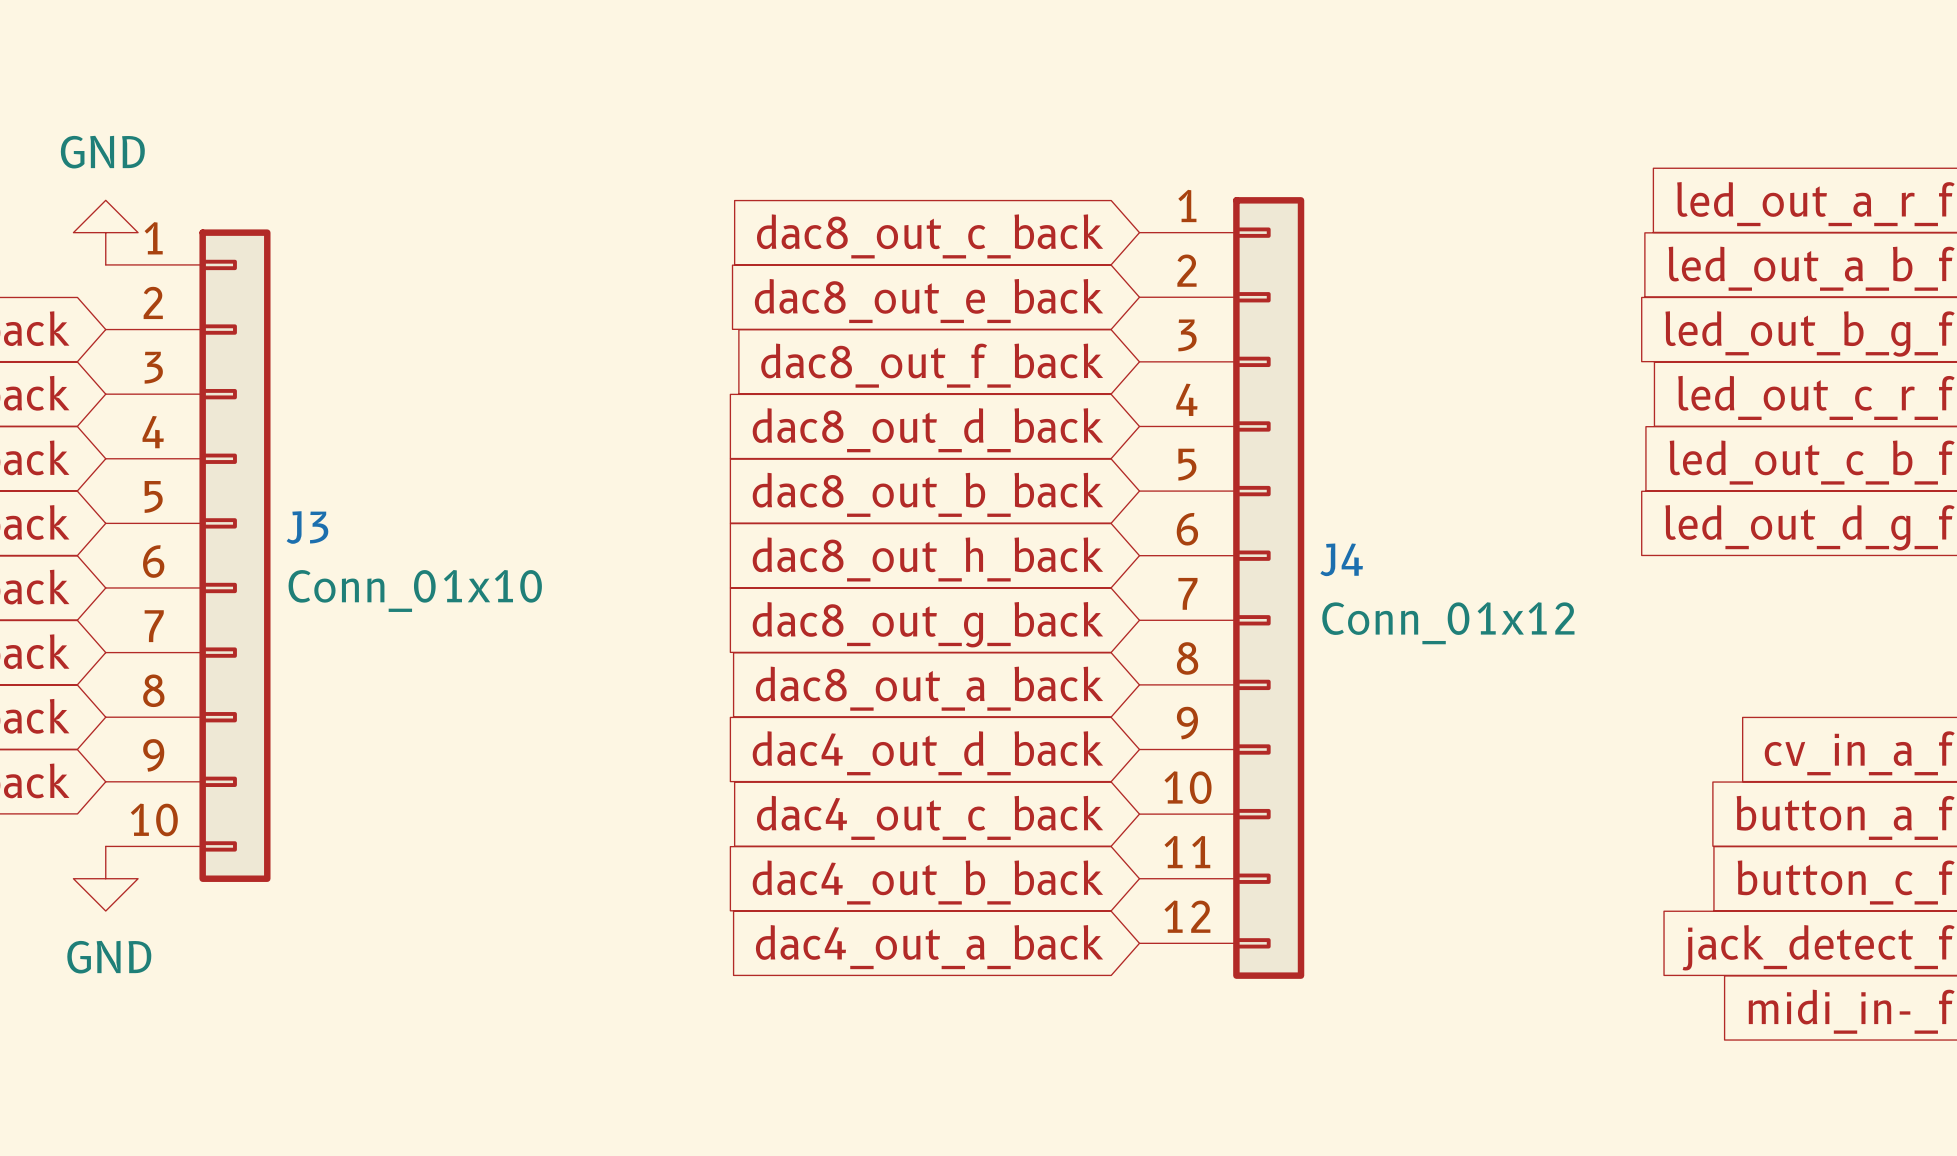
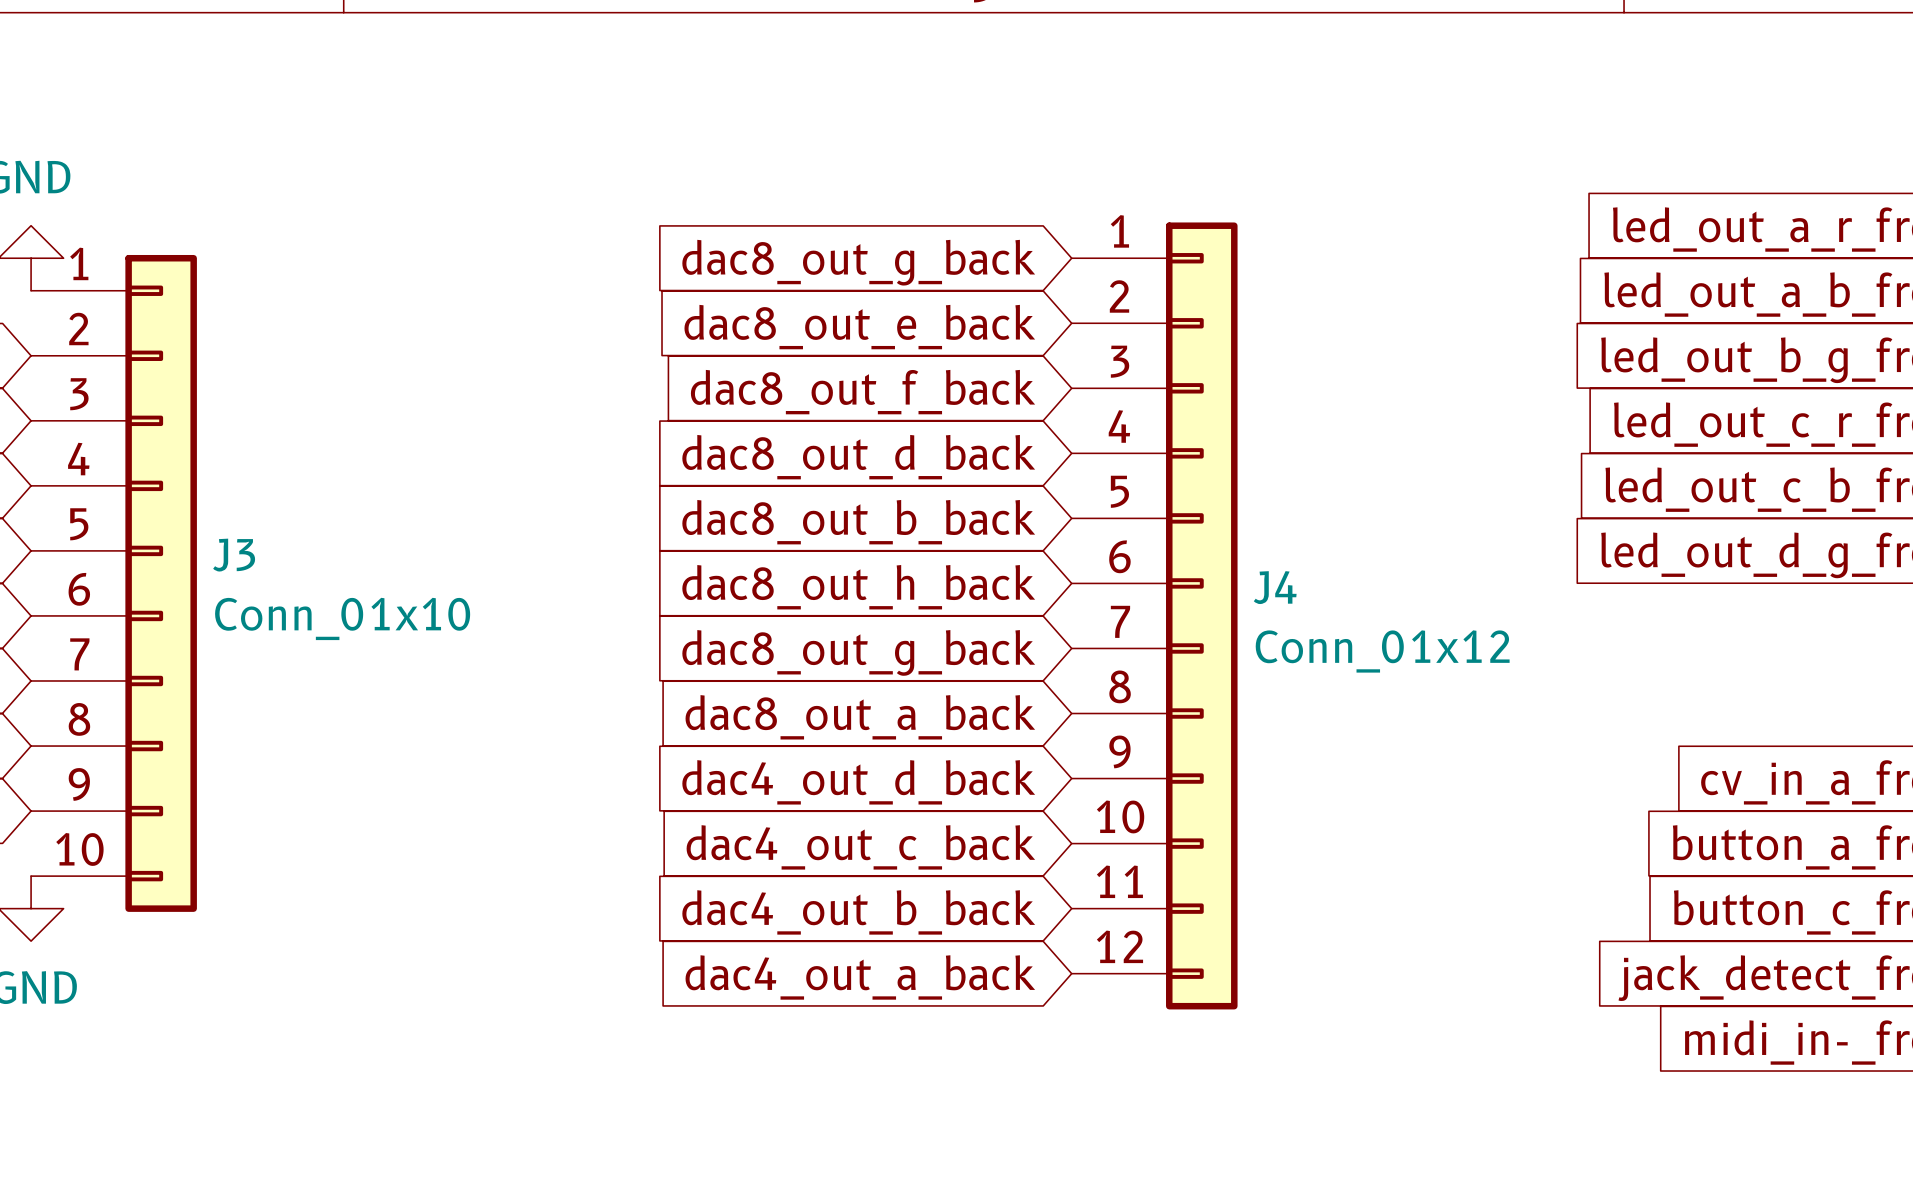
global label: dac8_out_c_back (930, 236) -> dac8_out_g_back (858, 262)

